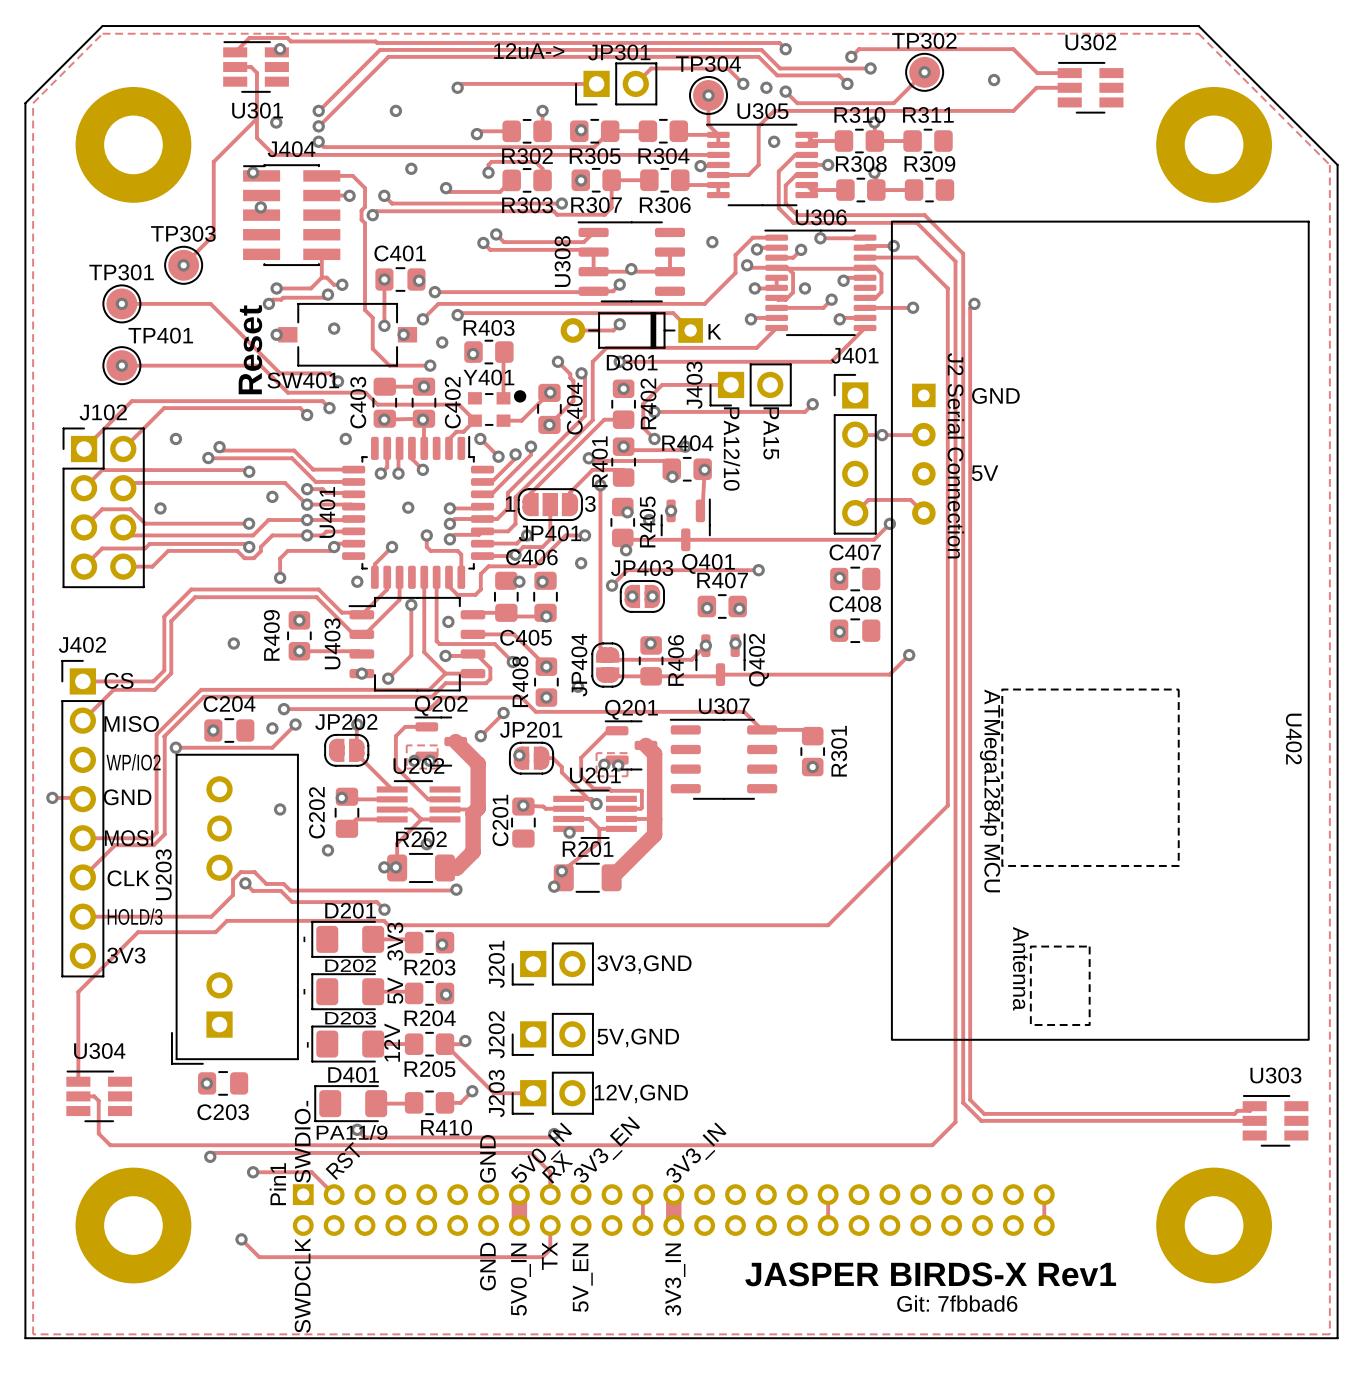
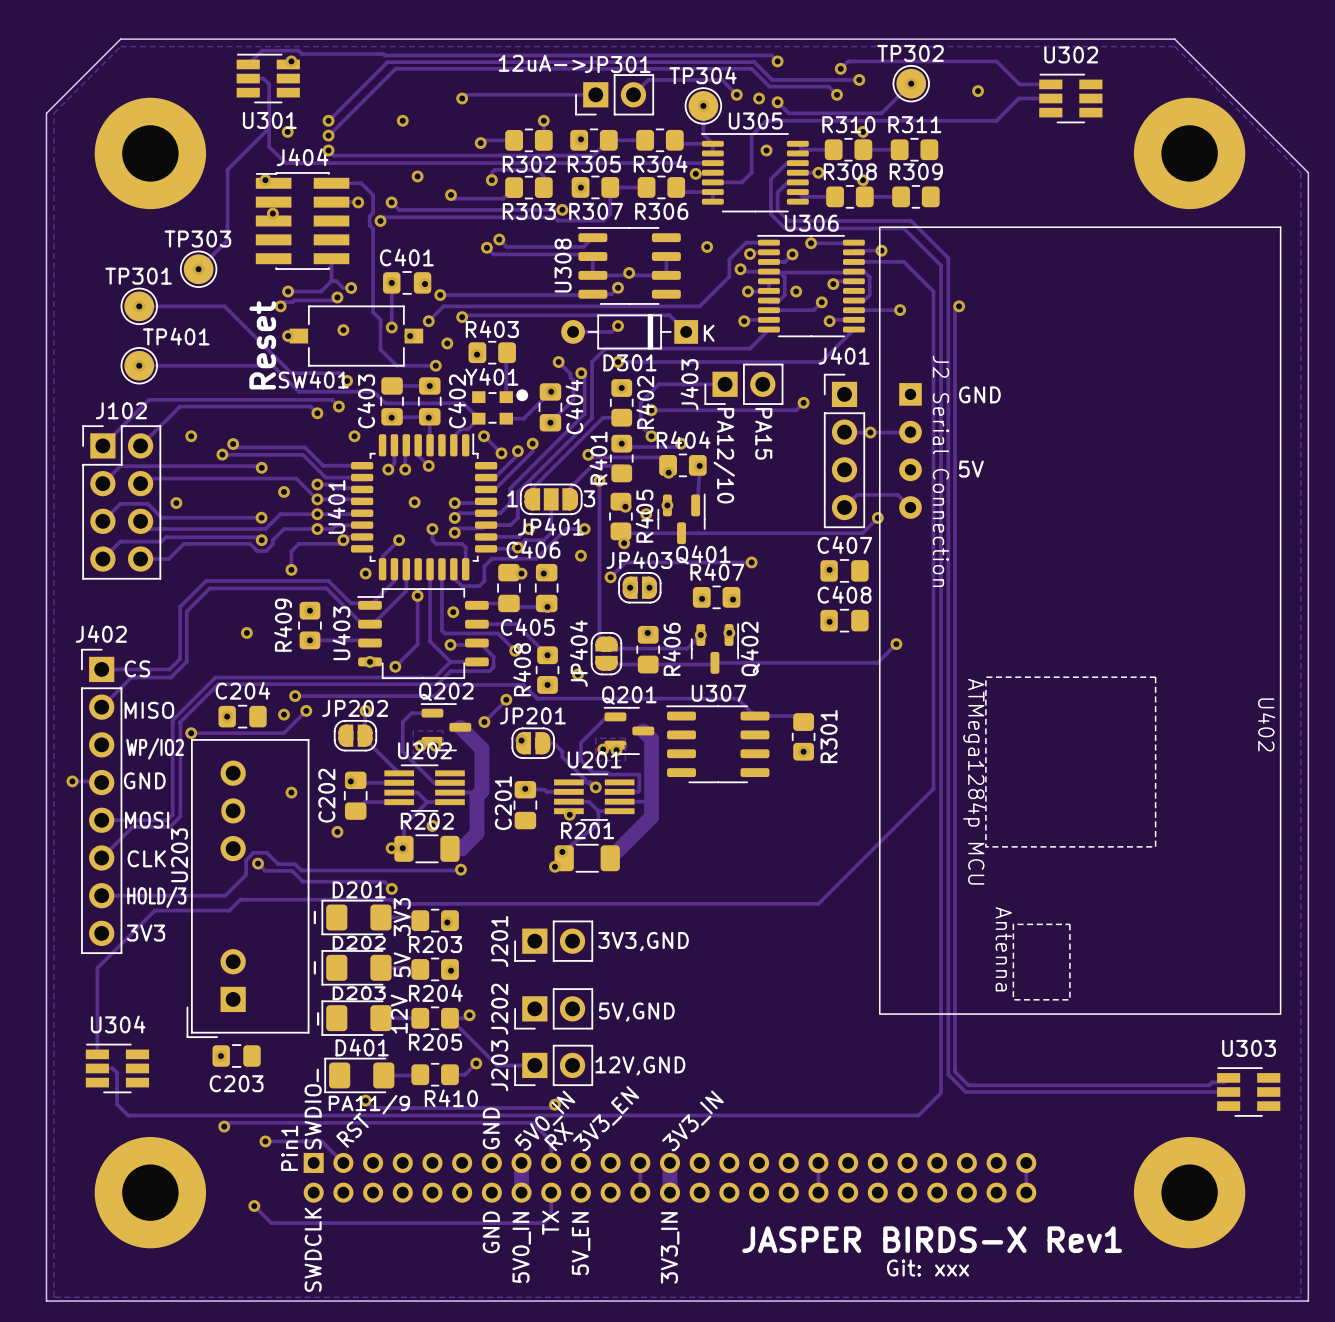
text: Git: 7fbbad6 (957, 1303) -> Git: xxx (928, 1268)

